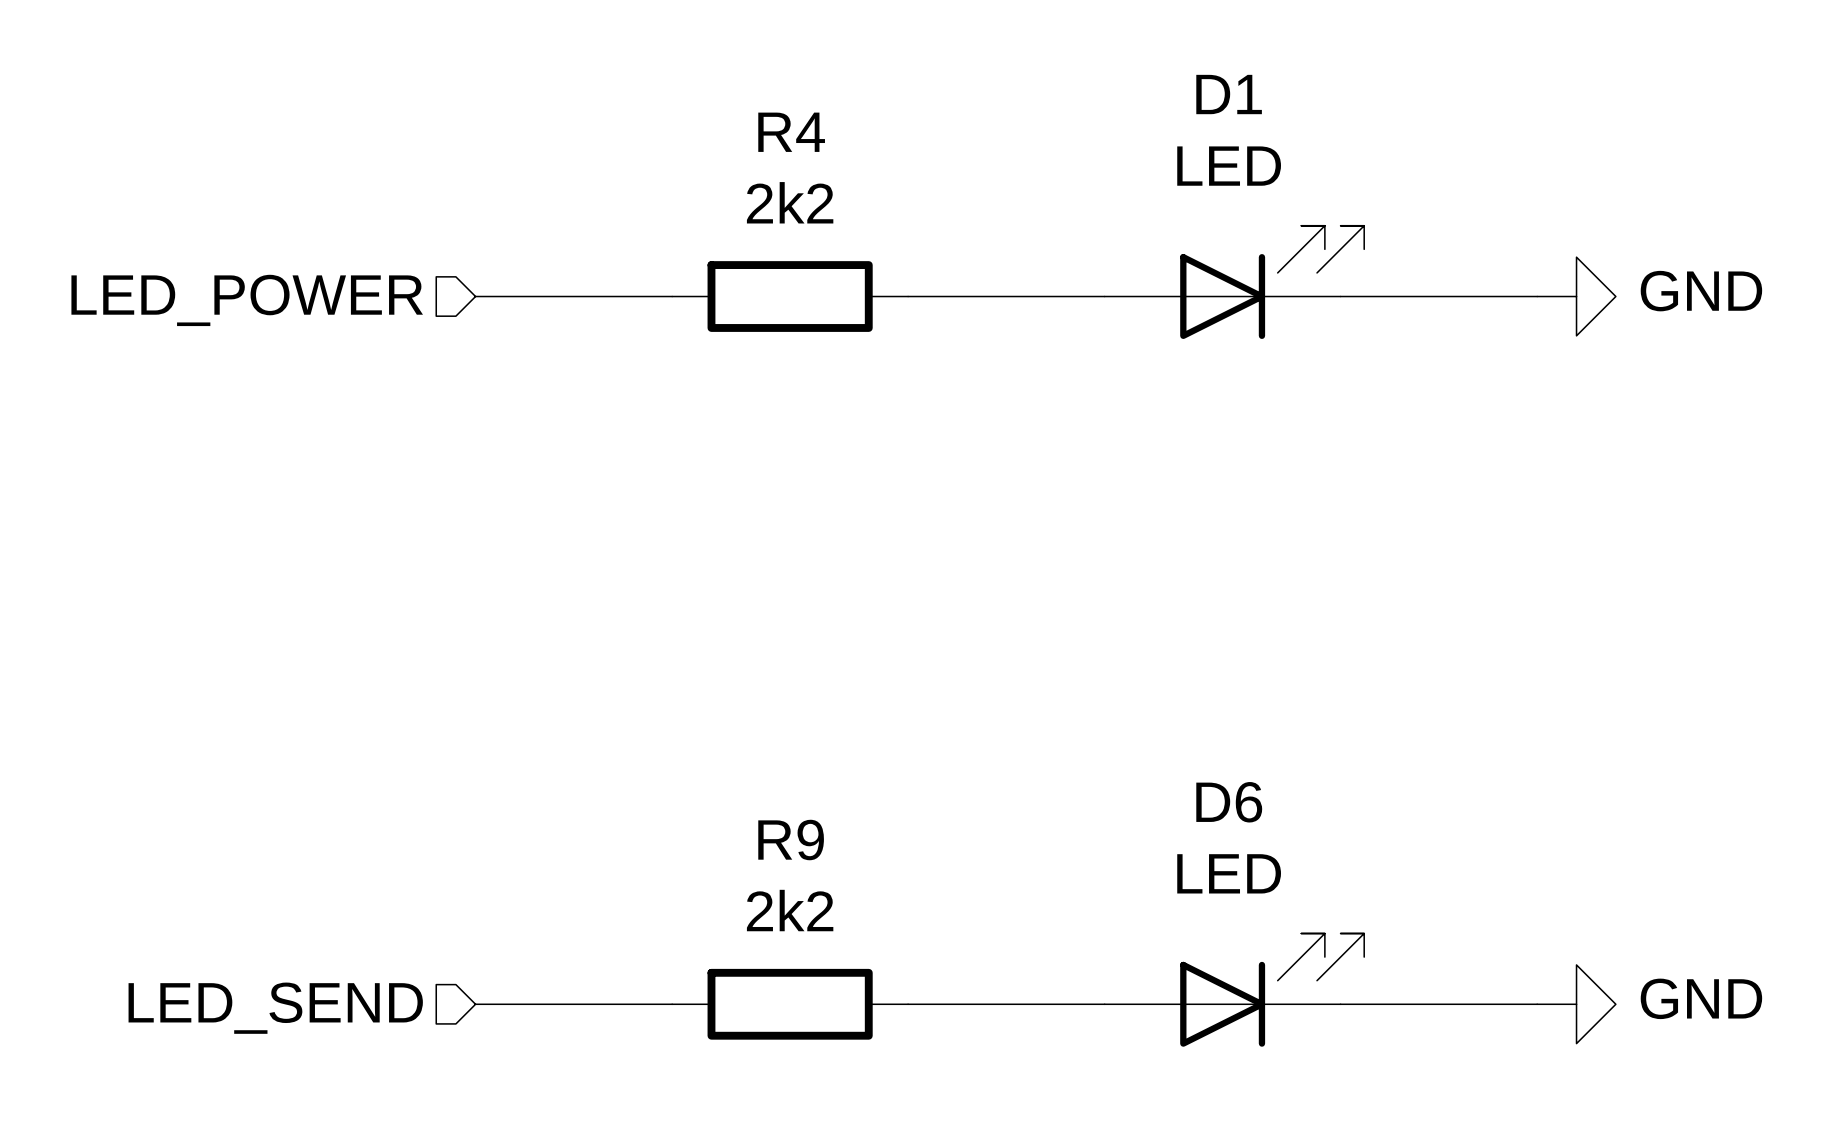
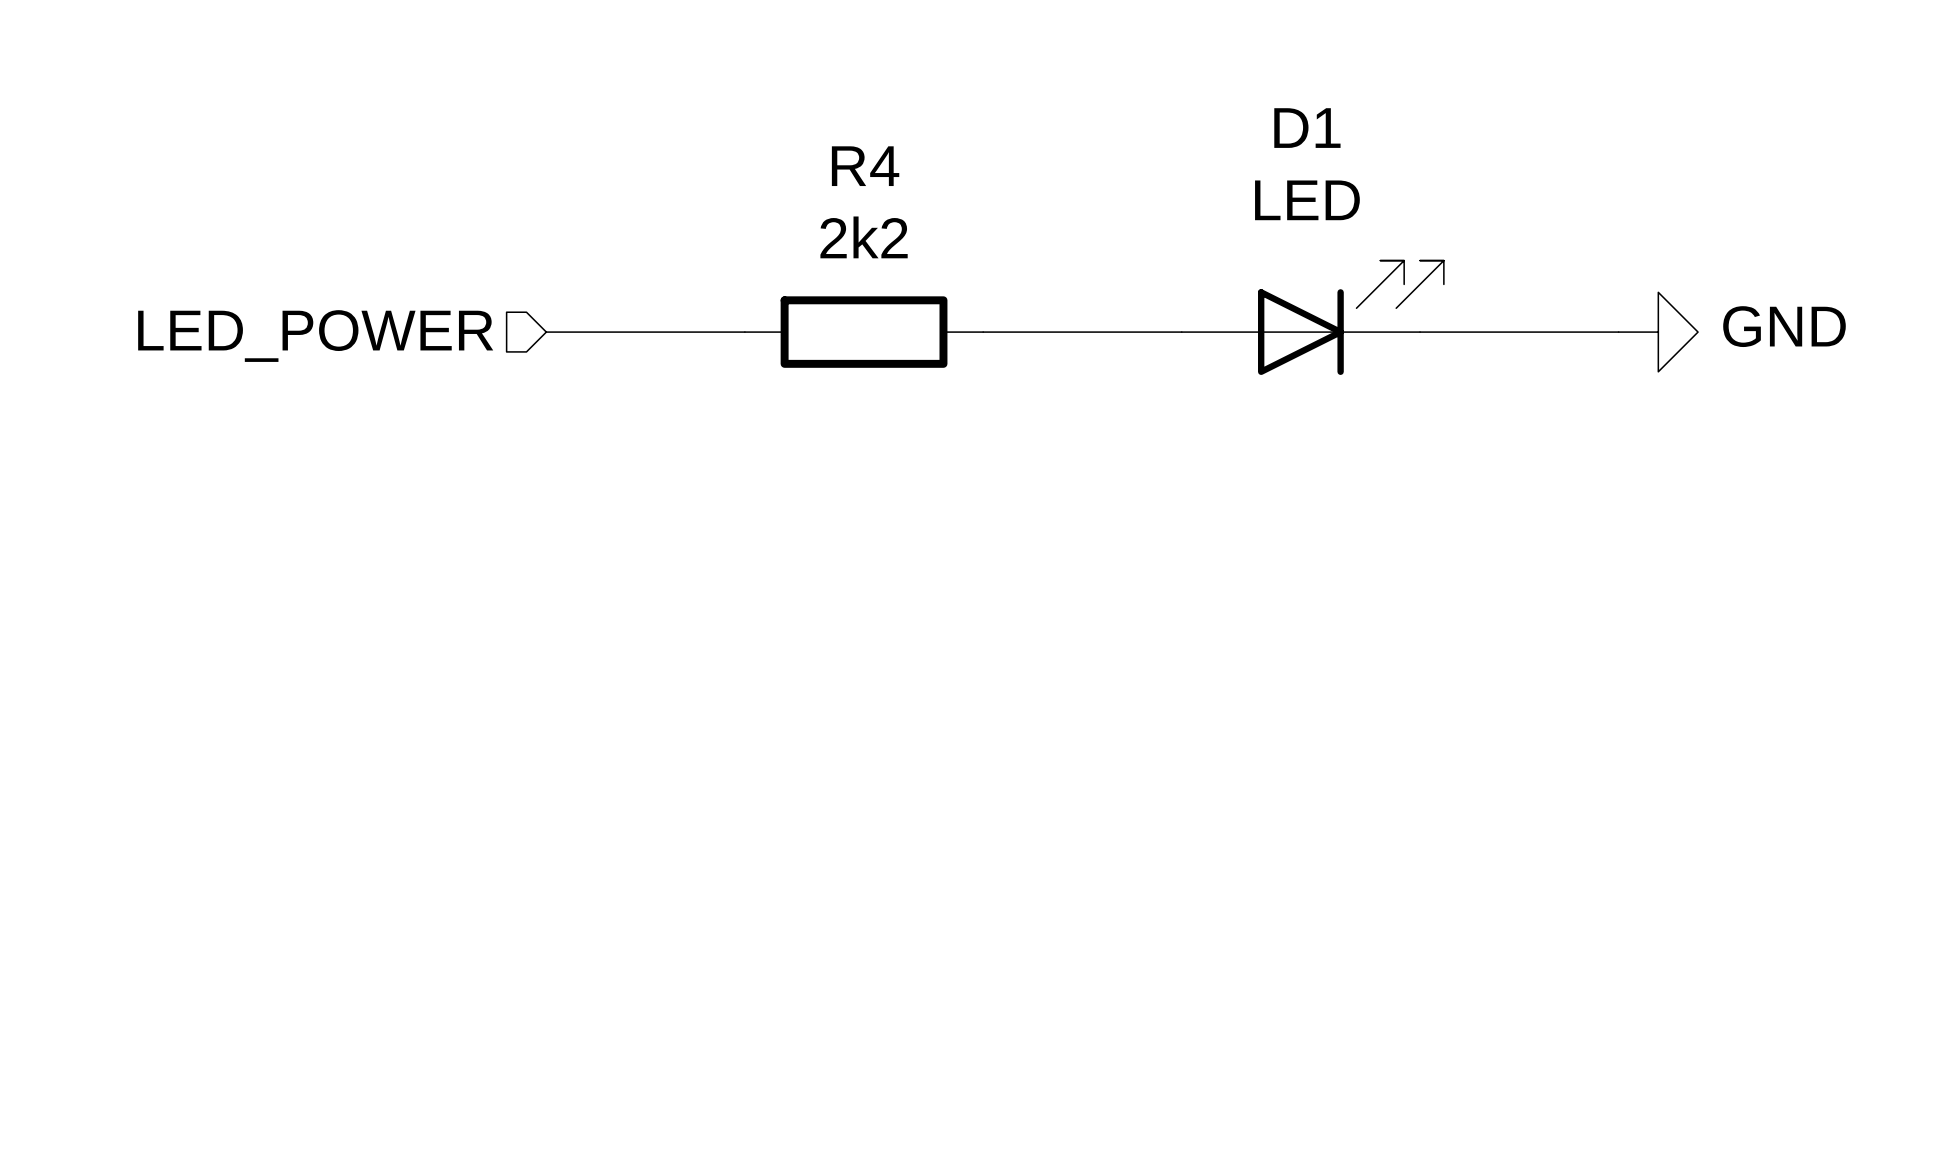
D6: LED (1234, 990) -> none
wire: (475, 1004) (672, 1004) -> none
R9: 2k2 (790, 1004) -> none
wire: (908, 1004) (1104, 1004) -> none
wire: (1340, 1004) (1537, 1004) -> none
power symbol: GND (1576, 1004) -> none
hierarchical label: LED_SEND (275, 1008) -> none

